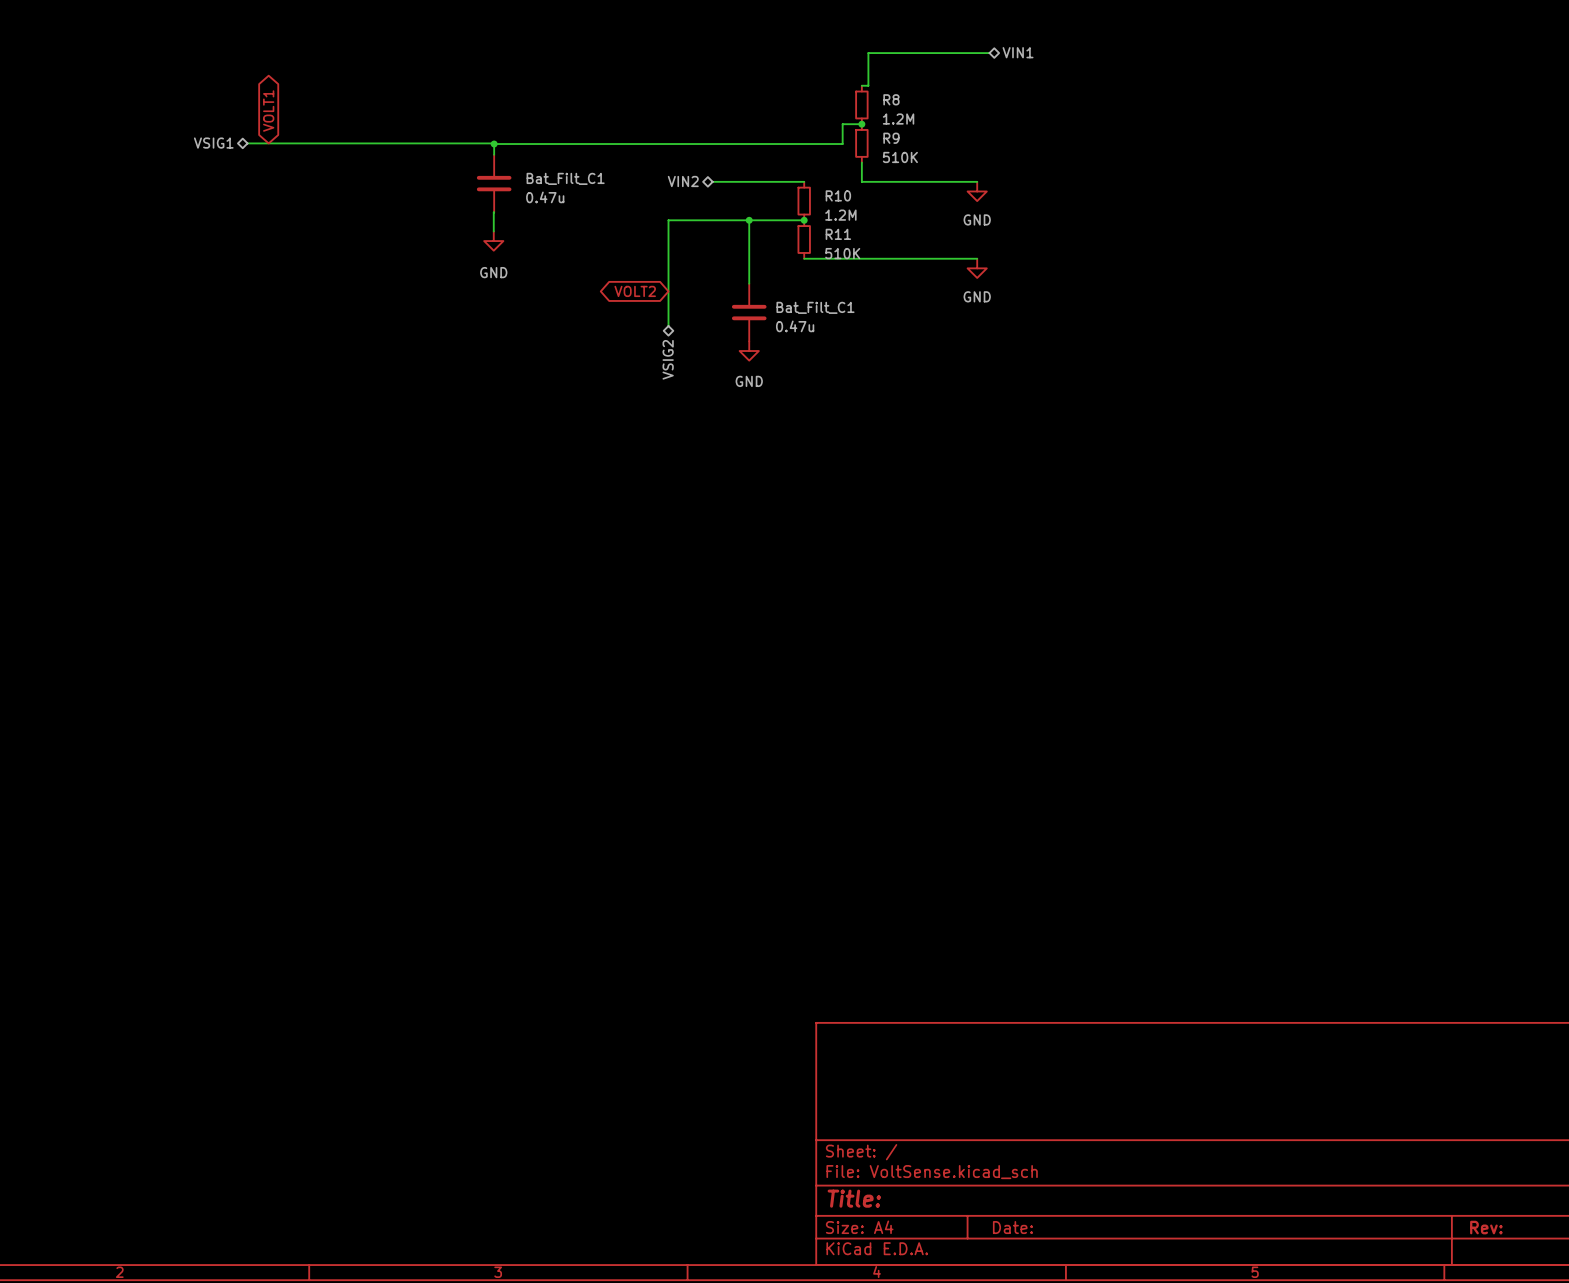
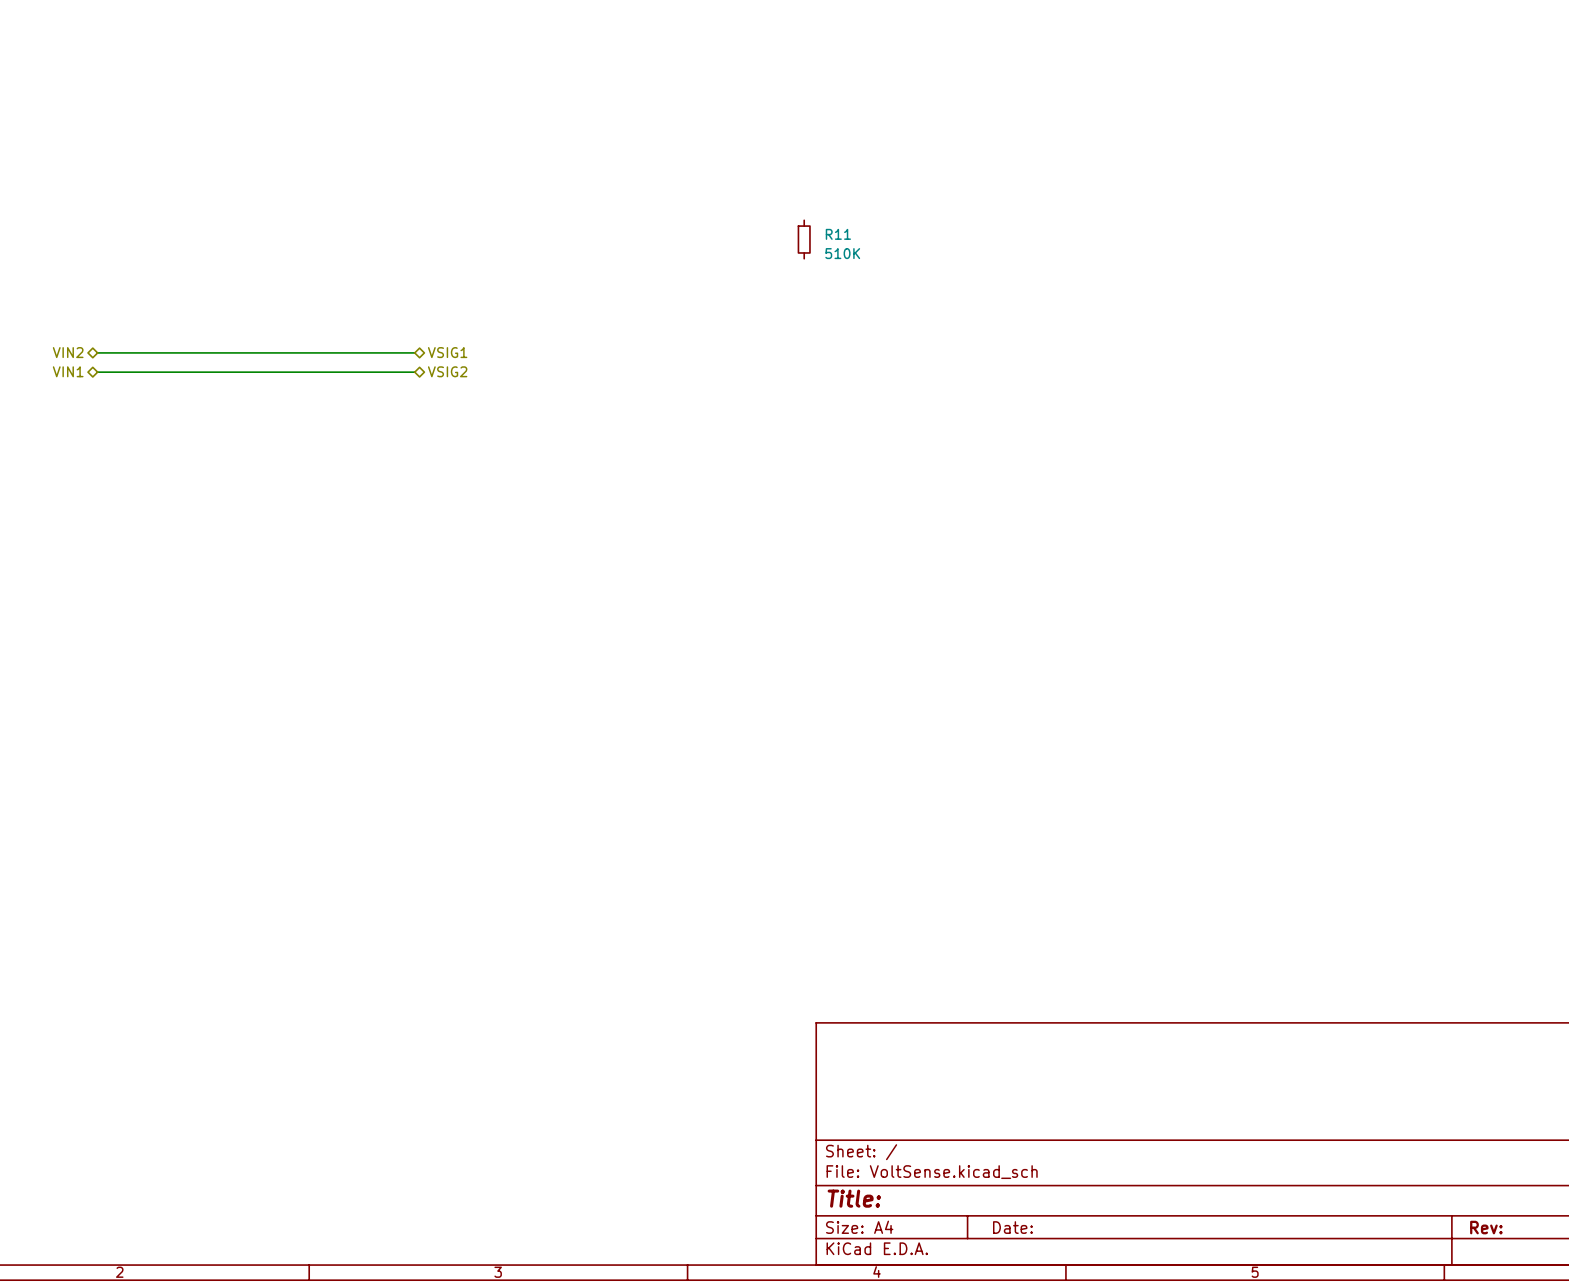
hierarchical label: VIN1 (1018, 52) -> none
wire: (989, 53) (868, 53) (868, 85) (861, 85) -> none
R8: 1.2M (861, 104) -> none
global label: VOLT1 (268, 111) -> none
wire: (861, 124) (842, 124) (842, 144) (494, 144) -> none
junction: (861, 124) -> none
hierarchical label: VSIG1 (213, 143) -> none
wire: (247, 143) (494, 143) (494, 154) -> none
R9: 510K (861, 143) -> none
junction: (494, 144) -> none
wire: (861, 162) (861, 181) (977, 181) -> none
hierarchical label: VIN2 (683, 181) -> none
wire: (712, 181) (804, 181) -> none
Bat_Filt_C1: 0.47u (494, 183) -> none
power symbol: GND (977, 191) -> none
R10: 1.2M (804, 201) -> none
wire: (494, 212) (493, 231) -> none
wire: (749, 220) (749, 283) -> none
junction: (749, 220) -> none
wire: (804, 220) (668, 220) (668, 326) -> none
junction: (804, 220) -> none
power symbol: GND (493, 241) -> none
wire: (804, 258) (977, 258) -> none
power symbol: GND (977, 268) -> none
global label: VOLT2 (635, 291) -> none
Bat_Filt_C1: 0.47u (749, 312) -> none
power symbol: GND (749, 351) -> none
hierarchical label: none -> VIN2 (68, 352)
wire: none -> (97, 352) (414, 352)
hierarchical label: none -> VSIG1 (447, 352)
hierarchical label: VSIG2 (668, 359) -> none
hierarchical label: none -> VIN1 (68, 371)
hierarchical label: none -> VSIG2 (447, 371)
wire: none -> (97, 372) (414, 372)

